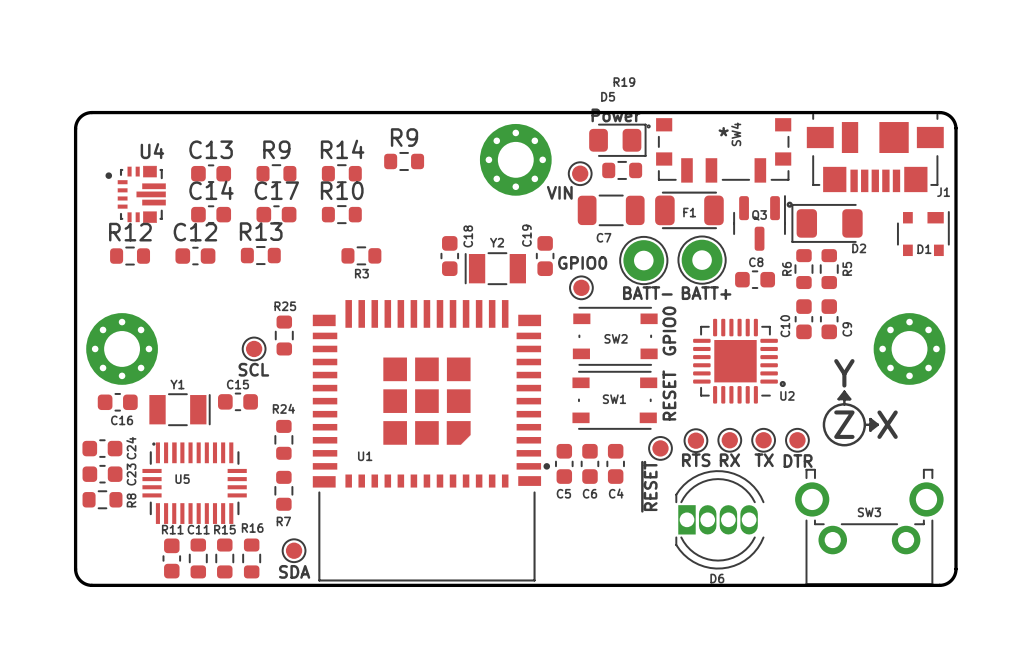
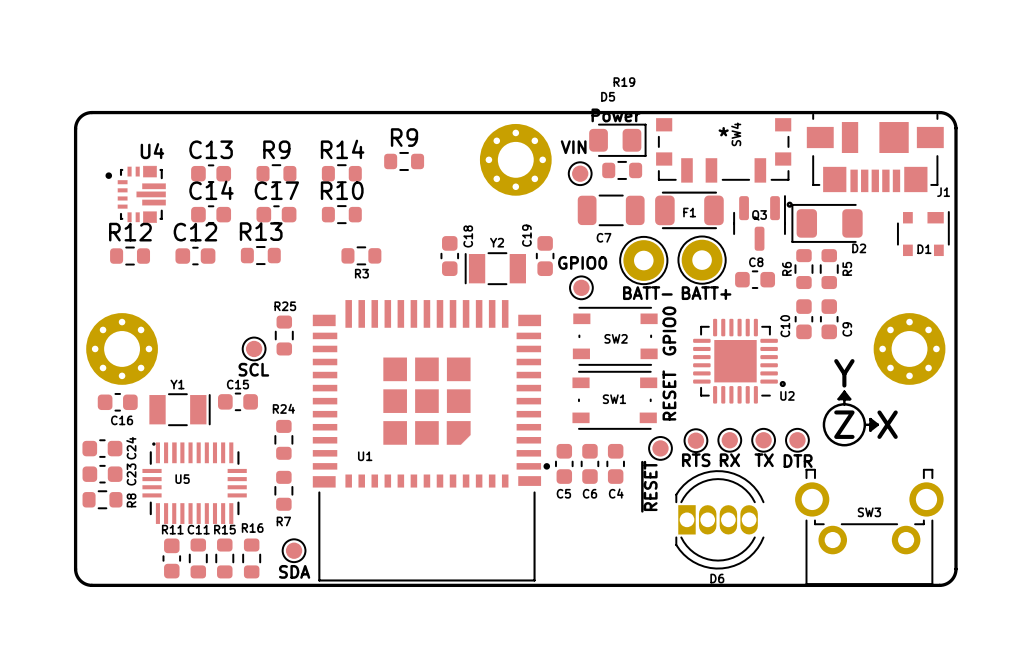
drawing: [646, 124, 651, 129] -> none
text position: VIN (559, 192) -> VIN (573, 147)

